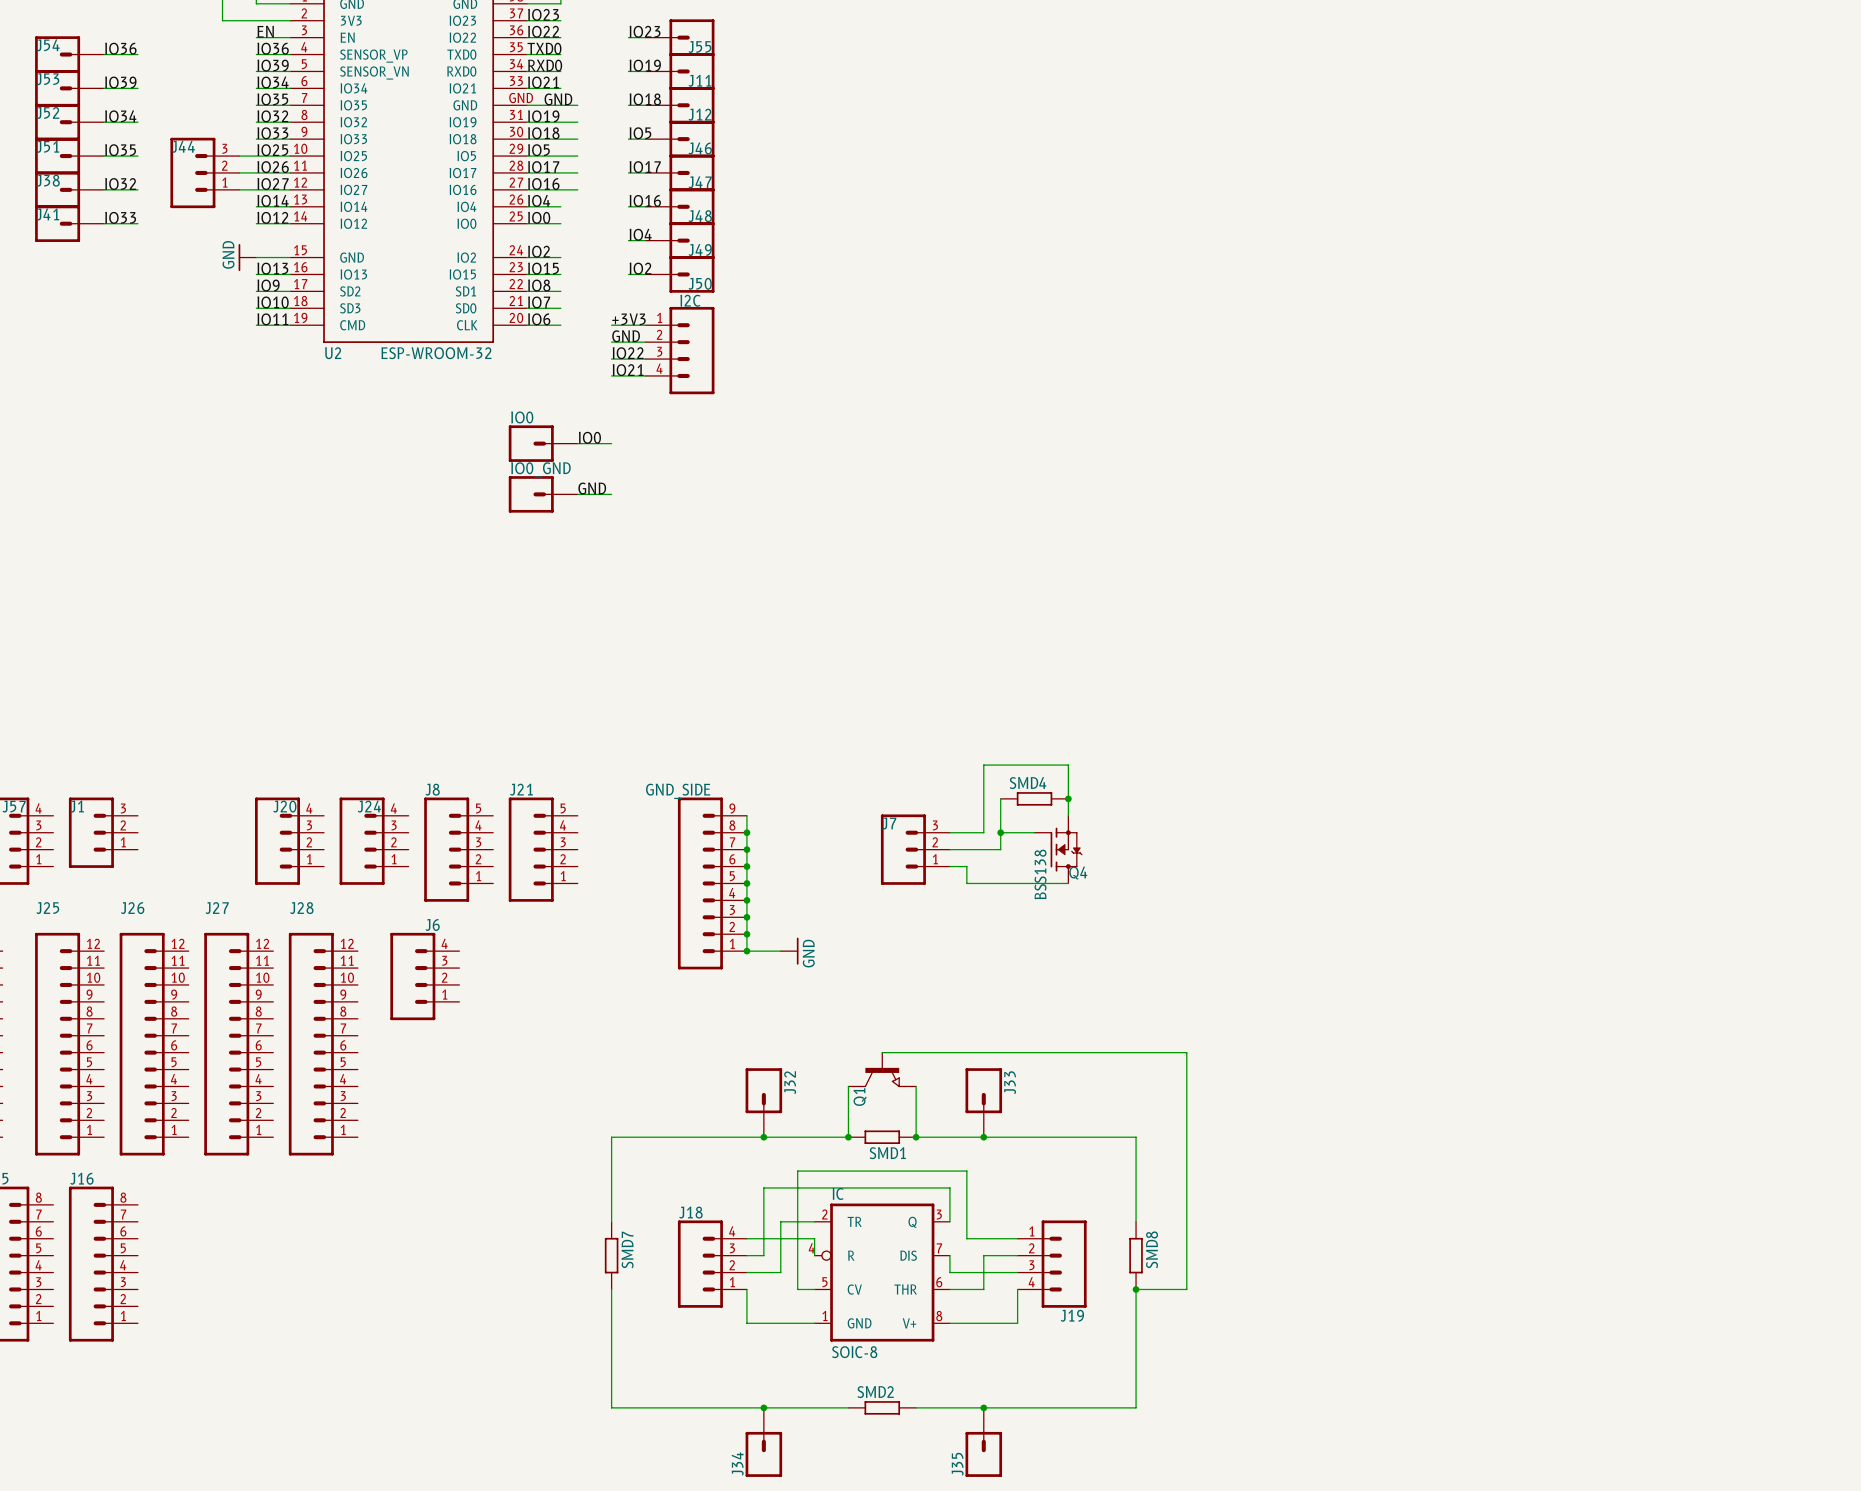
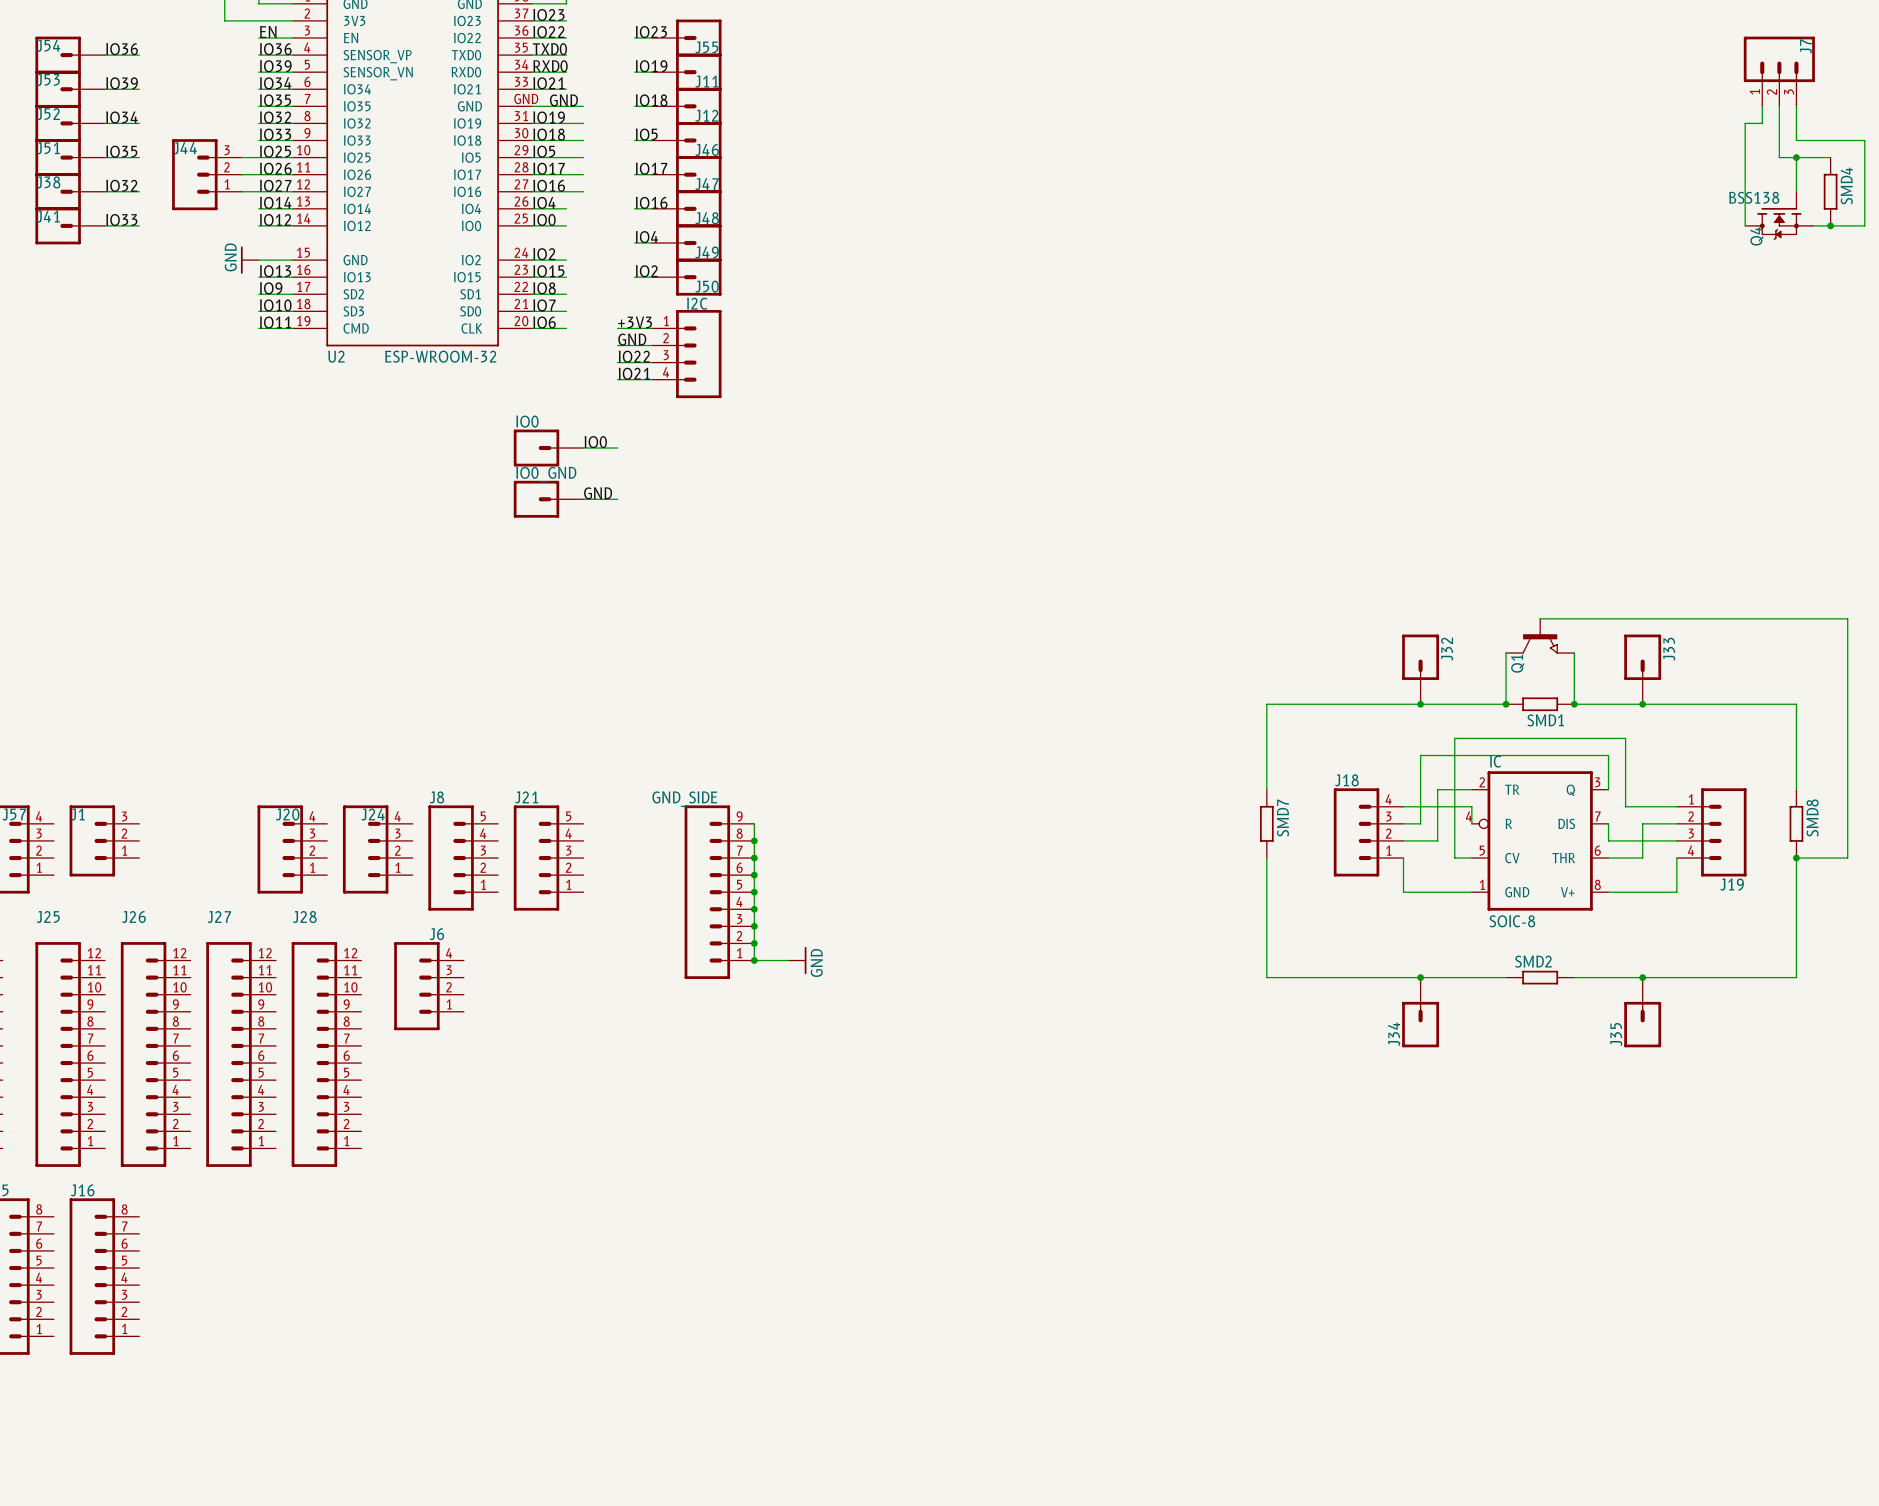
wire: none -> (1762, 106) (1762, 123) (1745, 123) (1745, 225)
wire: none -> (1779, 106) (1779, 157) (1830, 157)
wire: none -> (1796, 106) (1796, 140) (1864, 140) (1864, 225) (1813, 225)
wire: none -> (1796, 157) (1796, 191)
junction: none -> (1796, 157)
junction: none -> (1830, 225)
wire: none -> (1540, 618) (1847, 618) (1847, 858) (1796, 858) (1796, 977) (1574, 977)
wire: none -> (1506, 653) (1506, 704) (1266, 704) (1266, 789)
wire: none -> (1574, 653) (1574, 704) (1796, 704) (1796, 789)
junction: none -> (1420, 704)
junction: none -> (1506, 704)
junction: none -> (1574, 704)
junction: none -> (1642, 704)
wire: none -> (1471, 789) (1437, 789) (1437, 840) (1403, 840)
wire: none -> (1608, 789) (1608, 755) (1420, 755) (1420, 823) (1403, 823)
wire: (1000, 798) (1000, 849) (949, 849) -> none
SMD4 rotation: 0° (1034, 798) -> 90° clockwise (1830, 191)
SMD4 position: (1034, 798) -> (1830, 191)
junction: (1068, 798) -> none
wire: none -> (1403, 806) (1471, 806) (1471, 823)
wire: none -> (1676, 806) (1625, 806) (1625, 738) (1454, 738) (1454, 858) (1471, 858)
wire: (1068, 815) (1068, 765) (983, 765) (983, 832) (949, 832) -> none
wire: none -> (1608, 823) (1608, 840) (1676, 840)
wire: none -> (1676, 823) (1642, 823) (1642, 858) (1608, 858)
wire: (1000, 832) (1034, 832) -> none
junction: (1000, 832) -> none
IC: none -> SOIC-8 (1540, 840)
J7 rotation: 0° (903, 849) -> 90° clockwise (1779, 59)
J7 position: (915, 849) -> (1779, 71)
Q4 position: (1058, 849) -> (1779, 215)
Q4 rotation: 0° (1066, 849) -> 90° clockwise (1779, 224)
wire: none -> (1266, 858) (1266, 977) (1506, 977)
wire: none -> (1403, 858) (1403, 892) (1471, 892)
wire: none -> (1676, 858) (1676, 892) (1608, 892)
junction: none -> (1796, 858)
wire: (949, 866) (966, 866) (966, 883) (1068, 883) -> none
junction: none -> (1420, 977)
junction: none -> (1642, 977)
wire: (882, 1052) (1186, 1052) (1186, 1289) (1136, 1289) (1136, 1407) (916, 1407) -> none
Q1 position: (882, 1069) -> (1540, 636)
wire: (848, 1086) (848, 1137) (611, 1137) (611, 1221) -> none
wire: (916, 1086) (916, 1137) (1136, 1137) (1136, 1221) -> none
J32 position: (763, 1102) -> (1420, 669)
J33 position: (983, 1102) -> (1642, 669)
junction: (763, 1137) -> none
junction: (848, 1137) -> none
SMD1 position: (882, 1137) -> (1540, 704)
junction: (916, 1137) -> none
junction: (983, 1137) -> none
wire: (814, 1221) (780, 1221) (780, 1272) (746, 1272) -> none
wire: (949, 1221) (949, 1187) (763, 1187) (763, 1255) (746, 1255) -> none
wire: (746, 1238) (814, 1238) (814, 1255) -> none
wire: (1017, 1238) (966, 1238) (966, 1171) (797, 1171) (797, 1289) (814, 1289) -> none
SMD7 position: (611, 1255) -> (1266, 823)
wire: (949, 1255) (949, 1272) (1017, 1272) -> none
wire: (1017, 1255) (983, 1255) (983, 1289) (949, 1289) -> none
SMD8 position: (1136, 1255) -> (1796, 823)
J18 position: (712, 1264) -> (1368, 832)
J19 position: (1052, 1264) -> (1711, 832)
IC: SOIC-8 (882, 1272) -> none
wire: (611, 1289) (611, 1407) (848, 1407) -> none
wire: (746, 1289) (746, 1323) (814, 1323) -> none
wire: (1017, 1289) (1017, 1323) (949, 1323) -> none
junction: (1136, 1289) -> none
junction: (763, 1407) -> none
SMD2 position: (882, 1407) -> (1540, 977)
junction: (983, 1407) -> none
J34 position: (763, 1442) -> (1420, 1012)
J35 position: (983, 1442) -> (1642, 1012)

